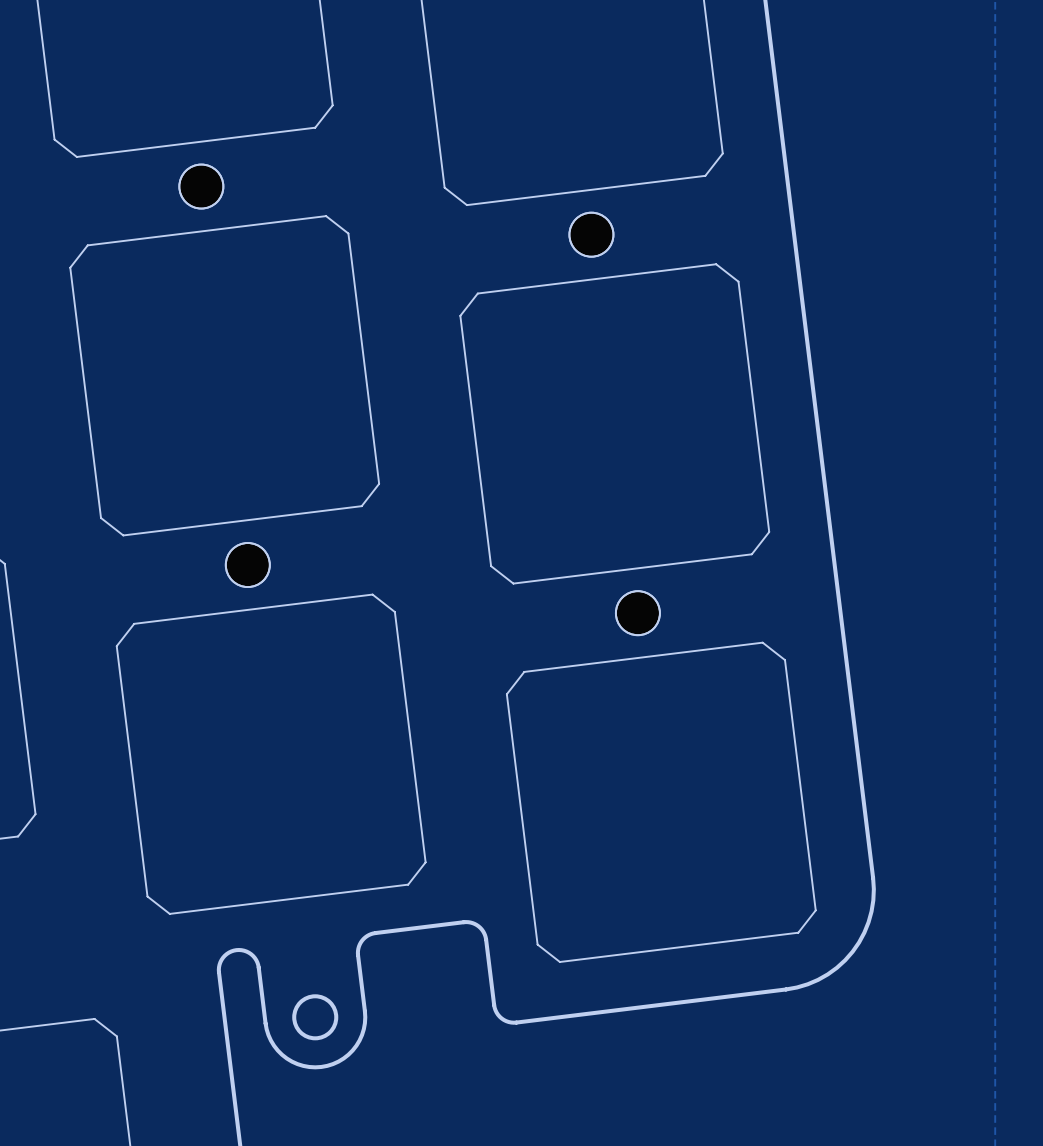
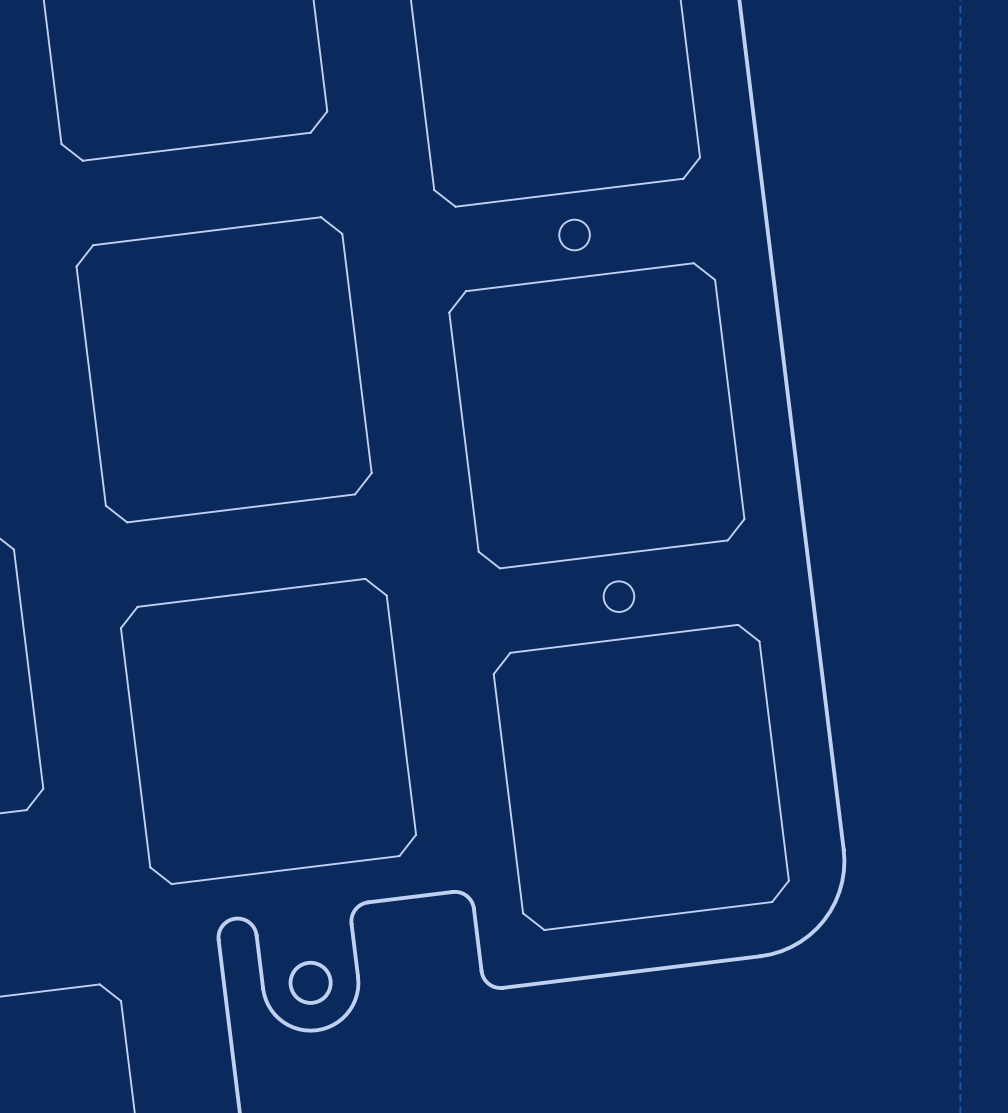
part: (201, 186) -> none
drawing: none -> [558, 219, 591, 251]
part: (591, 234) -> none
part: (247, 565) -> none
drawing: none -> [603, 580, 635, 613]
part: (637, 613) -> none

